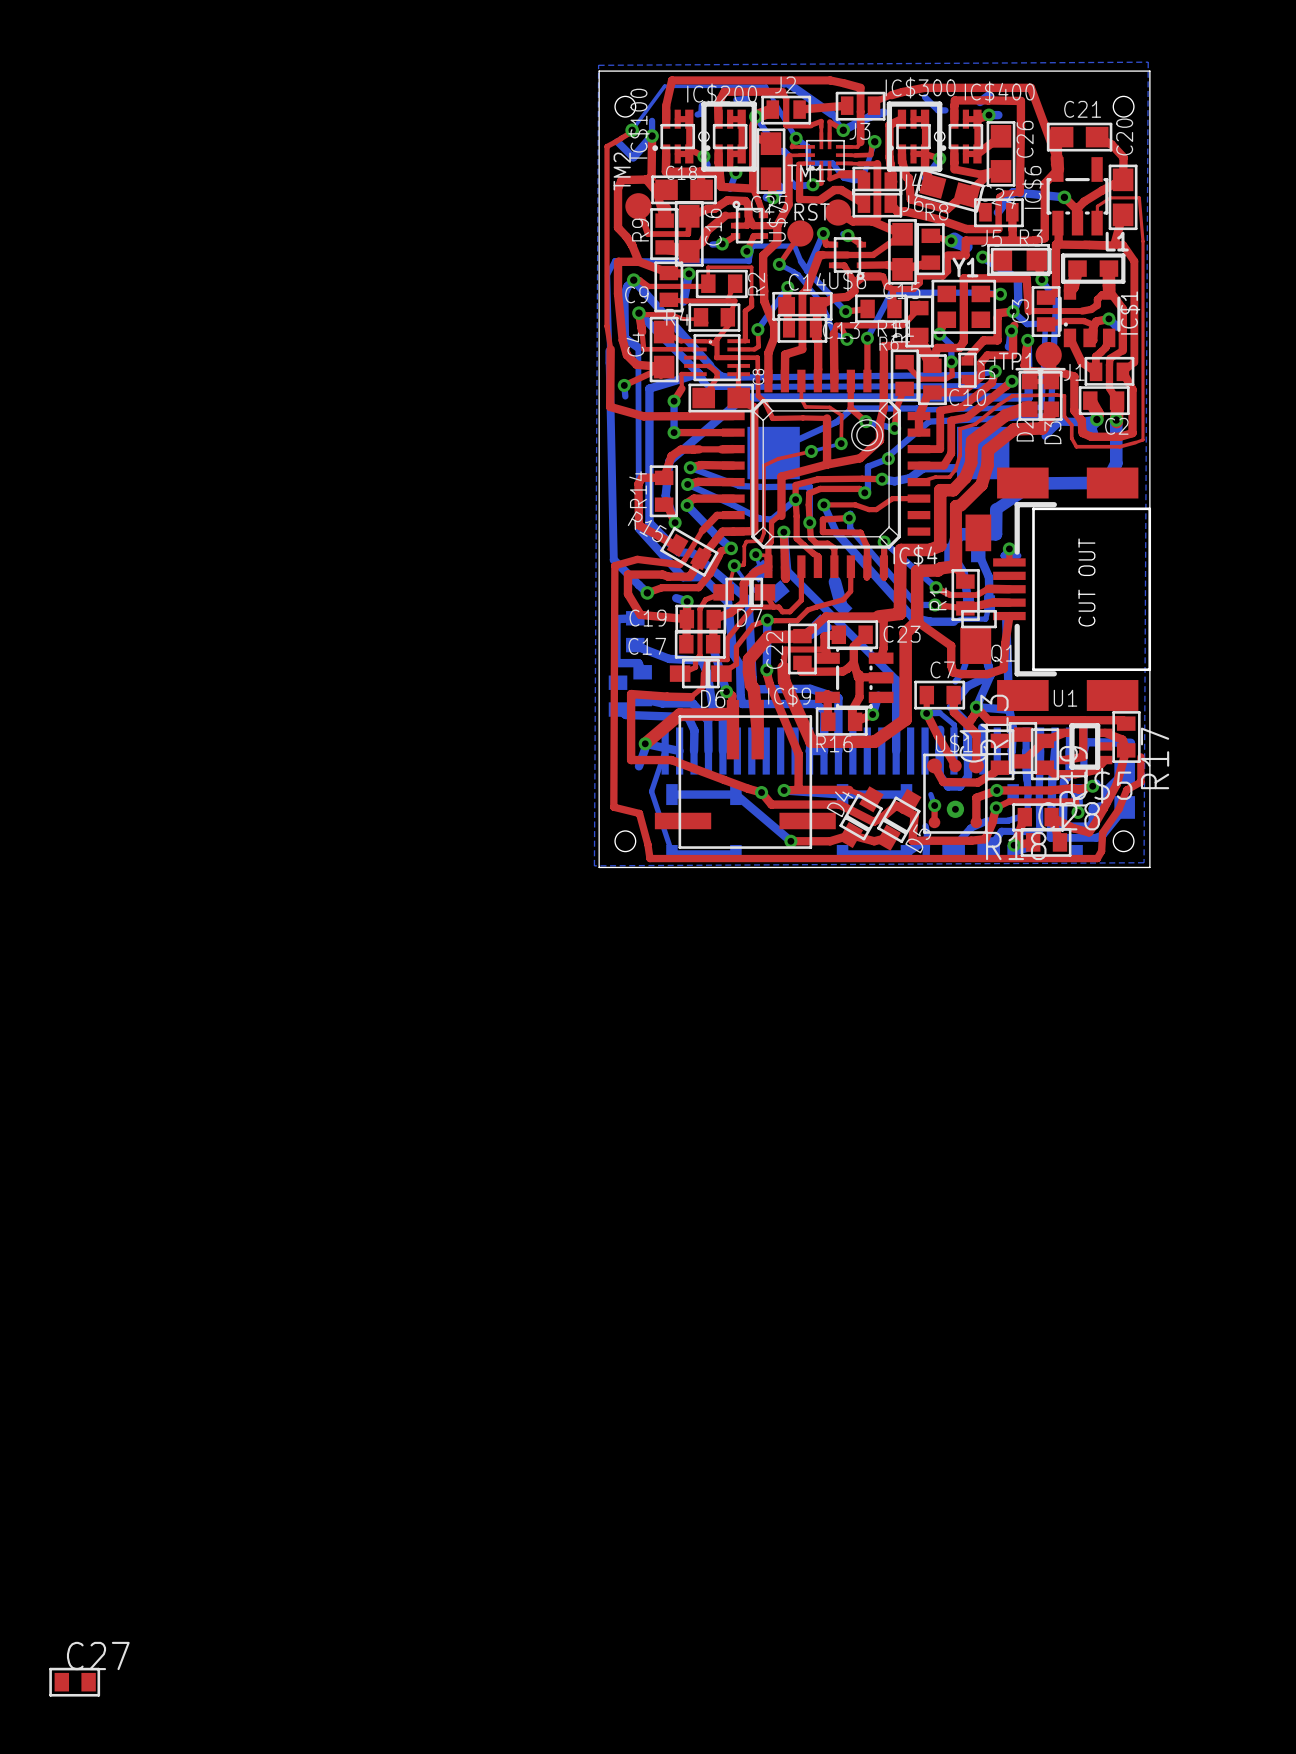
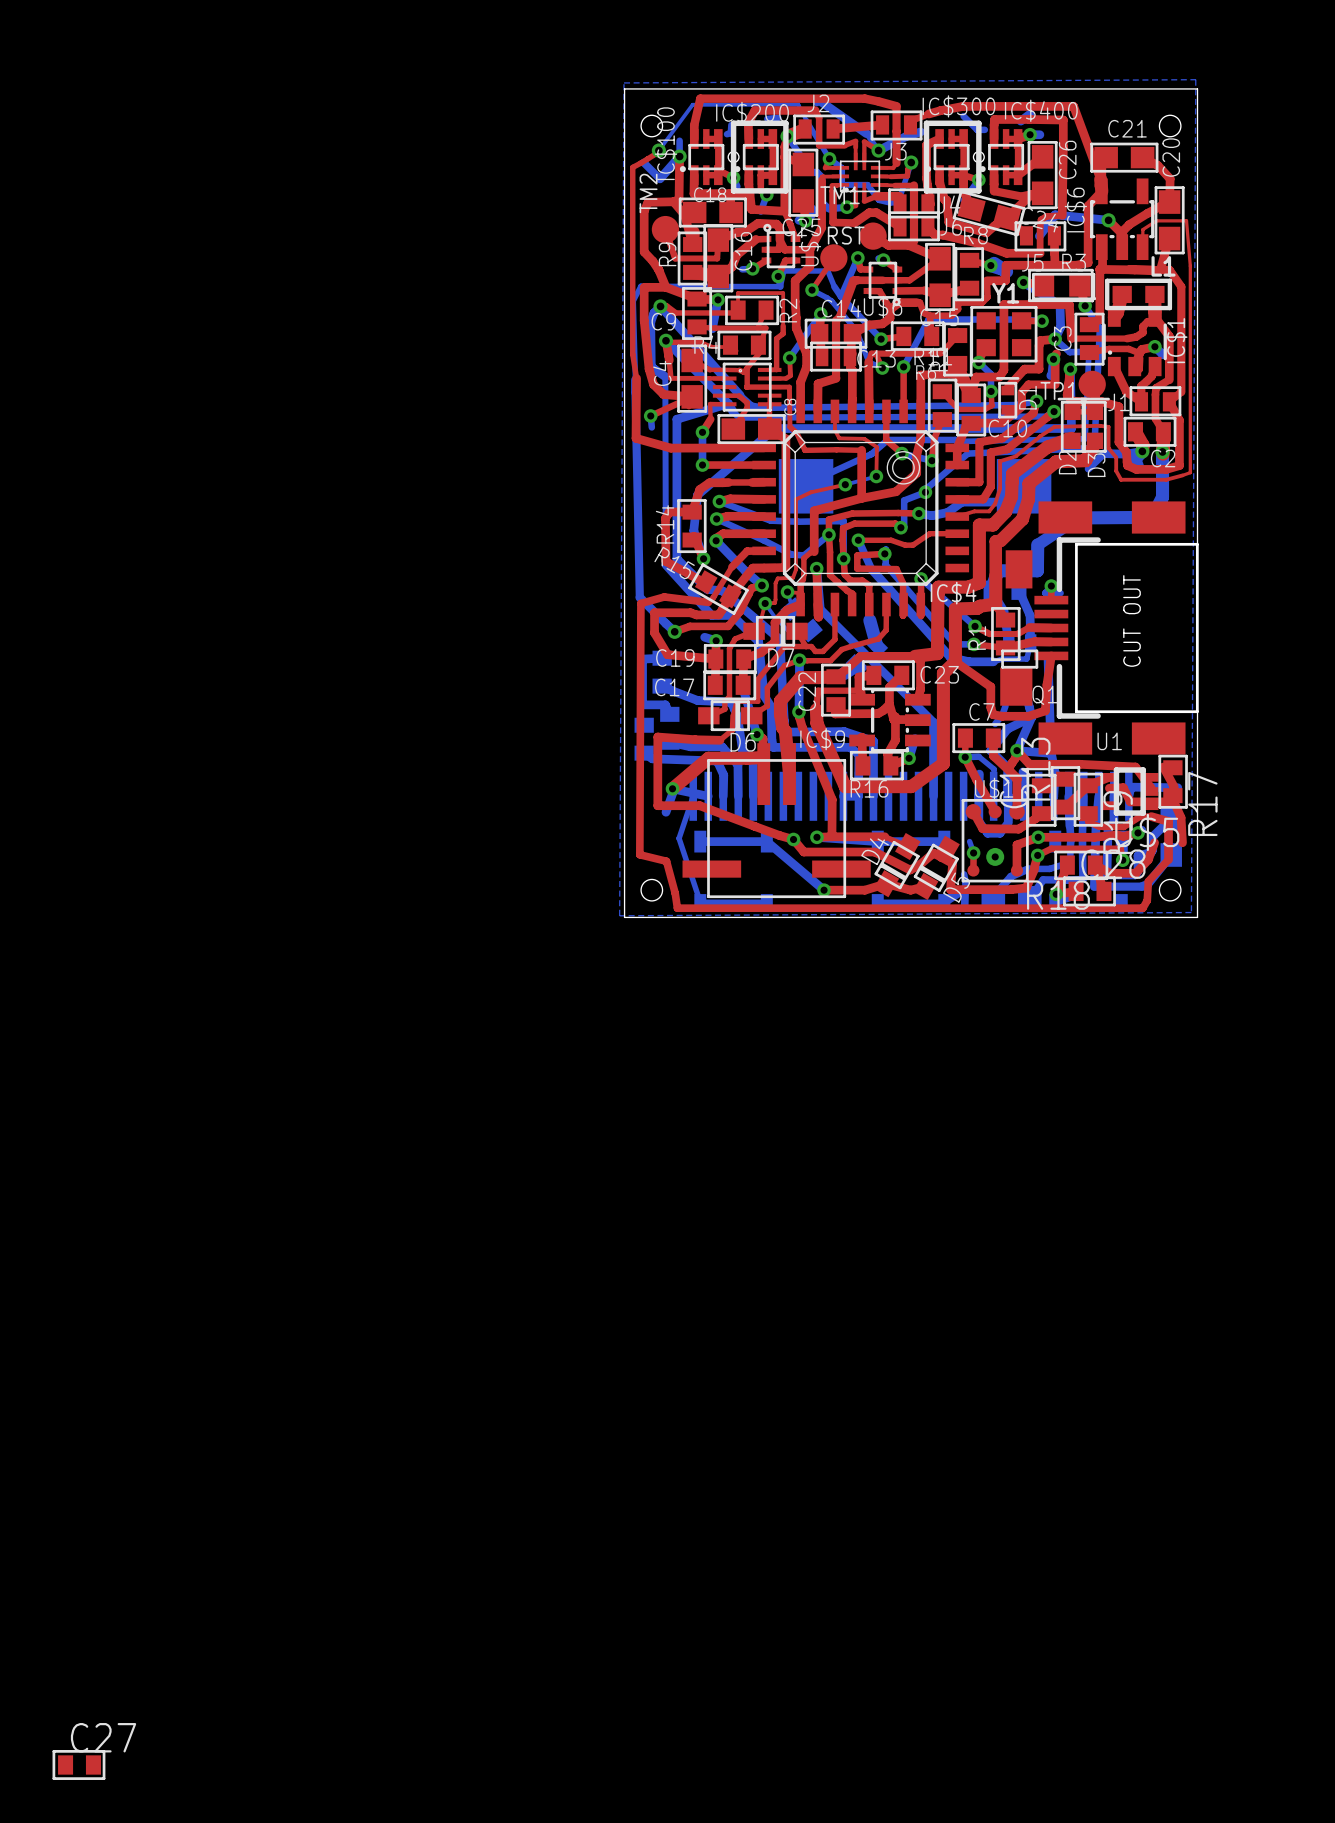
top track: (1036, 720) (1123, 720) (1126, 723) -> (1079, 764) (1135, 767) (1151, 788)
top track: (1083, 720) (1083, 756) (1064, 760) -> none
top track: none -> (1163, 767) (1173, 786) (1173, 801)
top track: (1105, 732) (1122, 739) (1126, 750) (1116, 784) (1094, 825) (1089, 832) (1073, 828) (1051, 817) -> (1154, 842) (1148, 859) (1135, 873) (1110, 873) (1095, 865)
top track: none -> (1109, 788) (1123, 787) (1130, 801) (1173, 801)
top track: none -> (1173, 801) (1181, 817) (1182, 842)
top track: (1140, 756) (1140, 782) (1126, 789) (1118, 809) (1102, 832) -> (1088, 821) (1098, 826) (1123, 826) (1140, 816) (1151, 816) (1168, 821) (1168, 859) (1148, 881)
top track: (1105, 760) (1095, 770) (1075, 774) (1054, 774) (1044, 767) -> none

